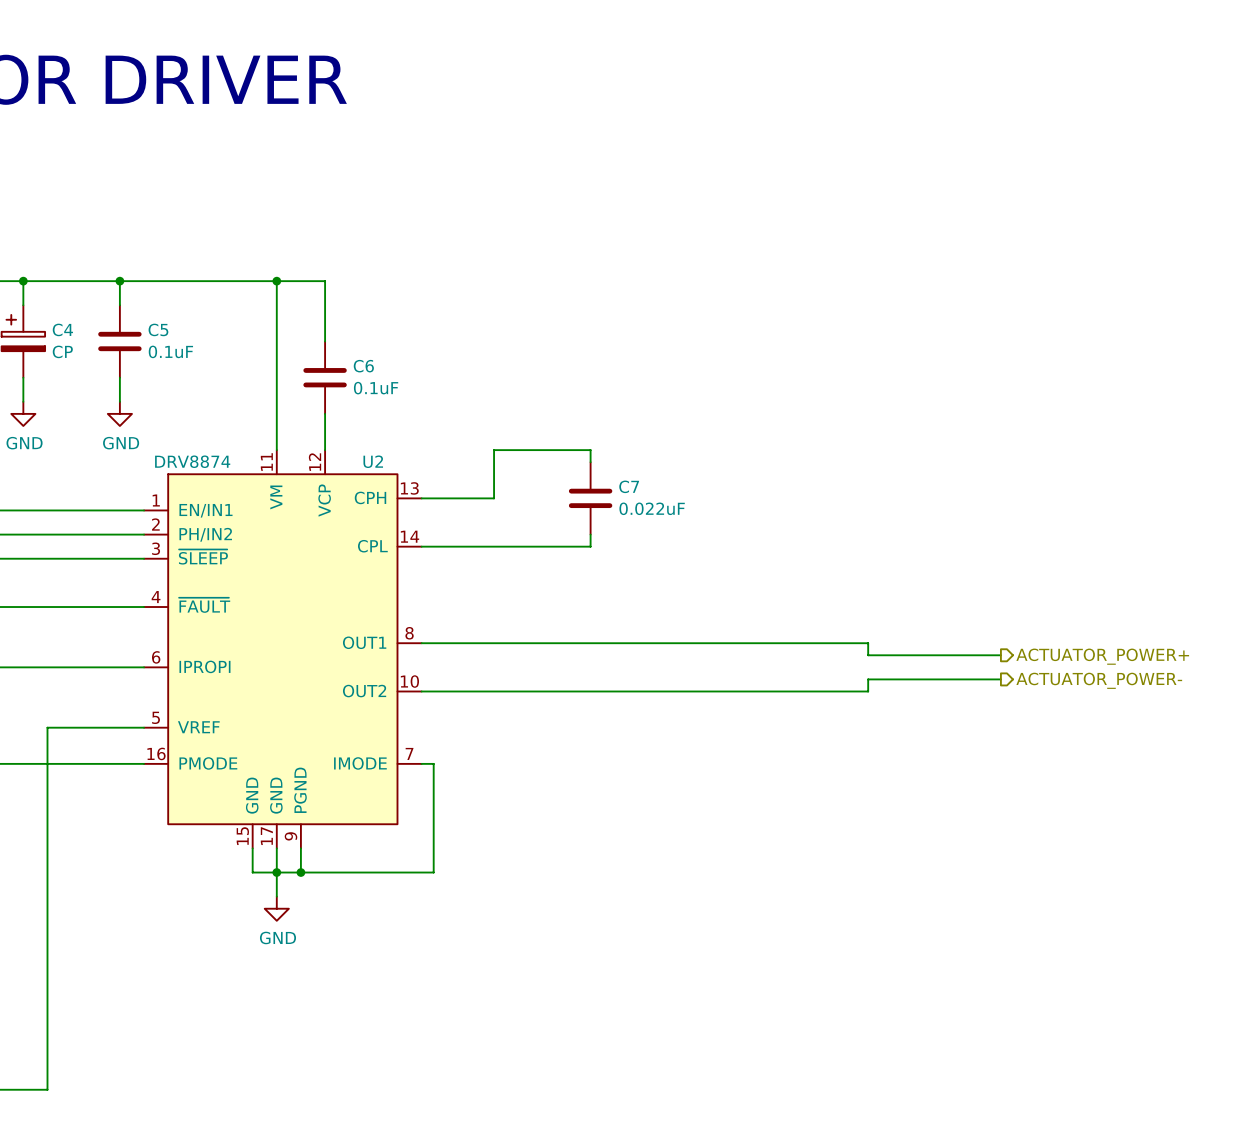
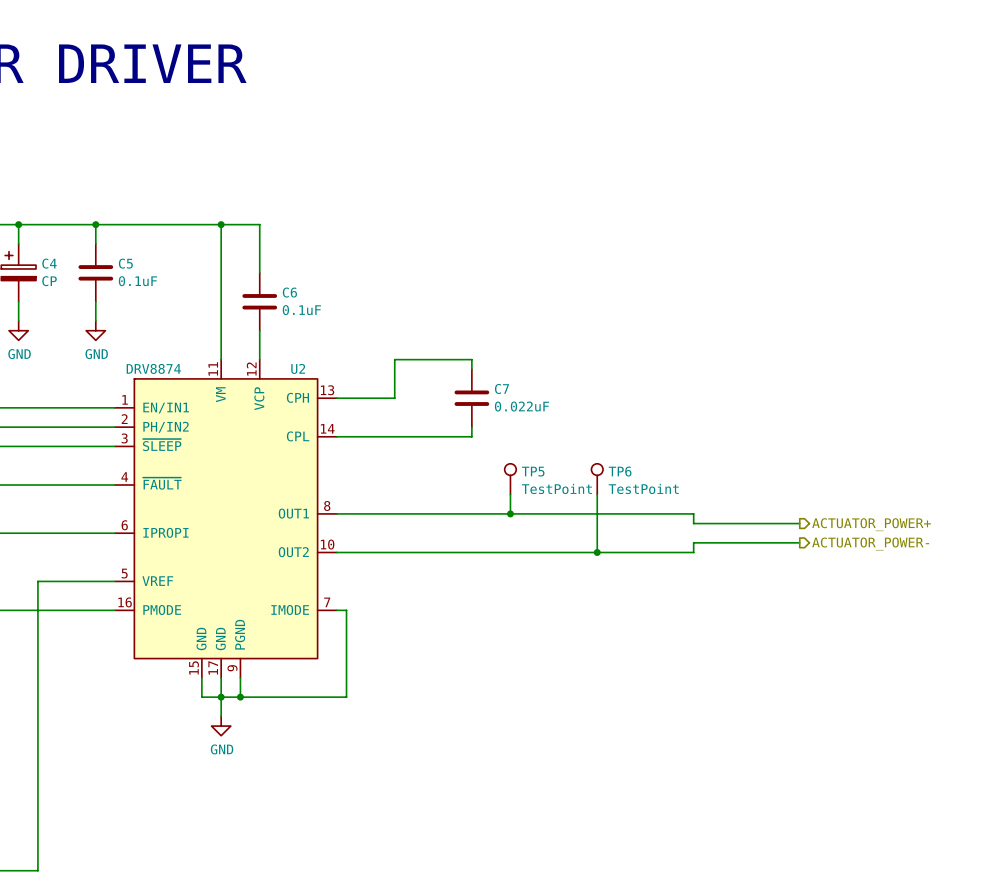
TP5: none -> TestPoint (510, 479)
TP6: none -> TestPoint (597, 479)
wire: none -> (510, 494) (510, 513)
wire: none -> (597, 494) (597, 552)
junction: none -> (510, 513)
junction: none -> (597, 552)

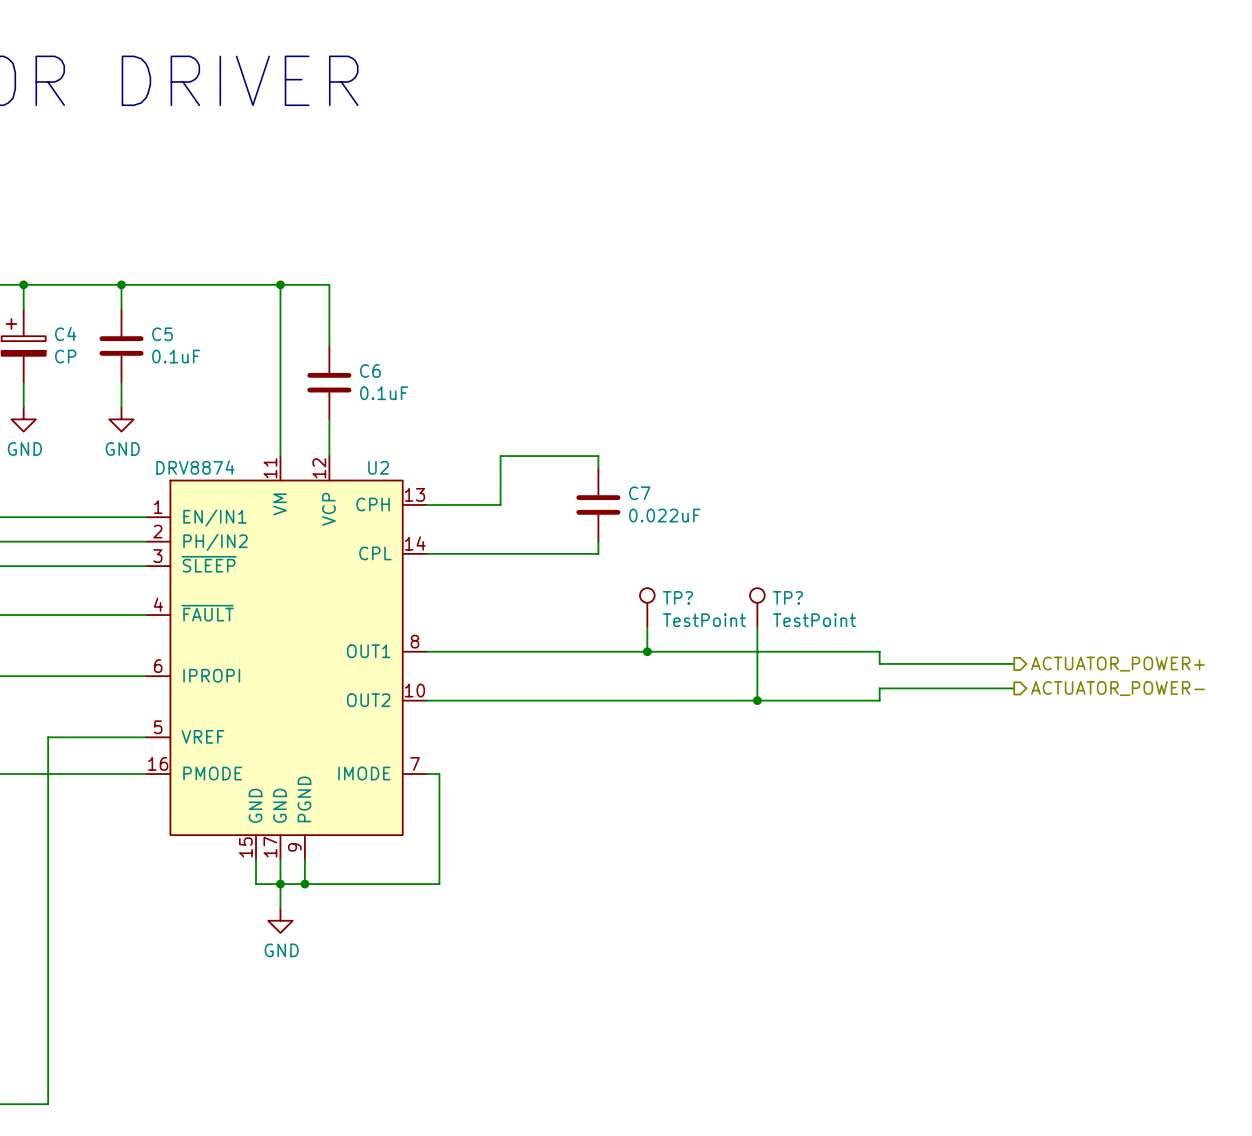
TP5 name: TP5 (533, 471) -> TP? (677, 597)
TP6 name: TP6 (620, 471) -> TP? (787, 597)

